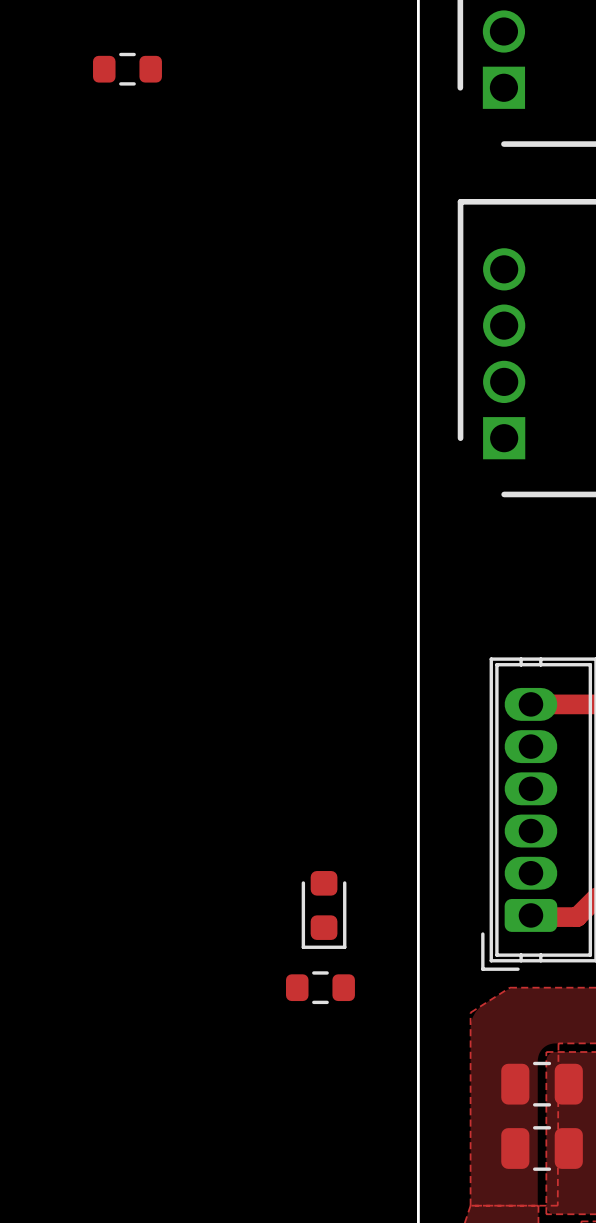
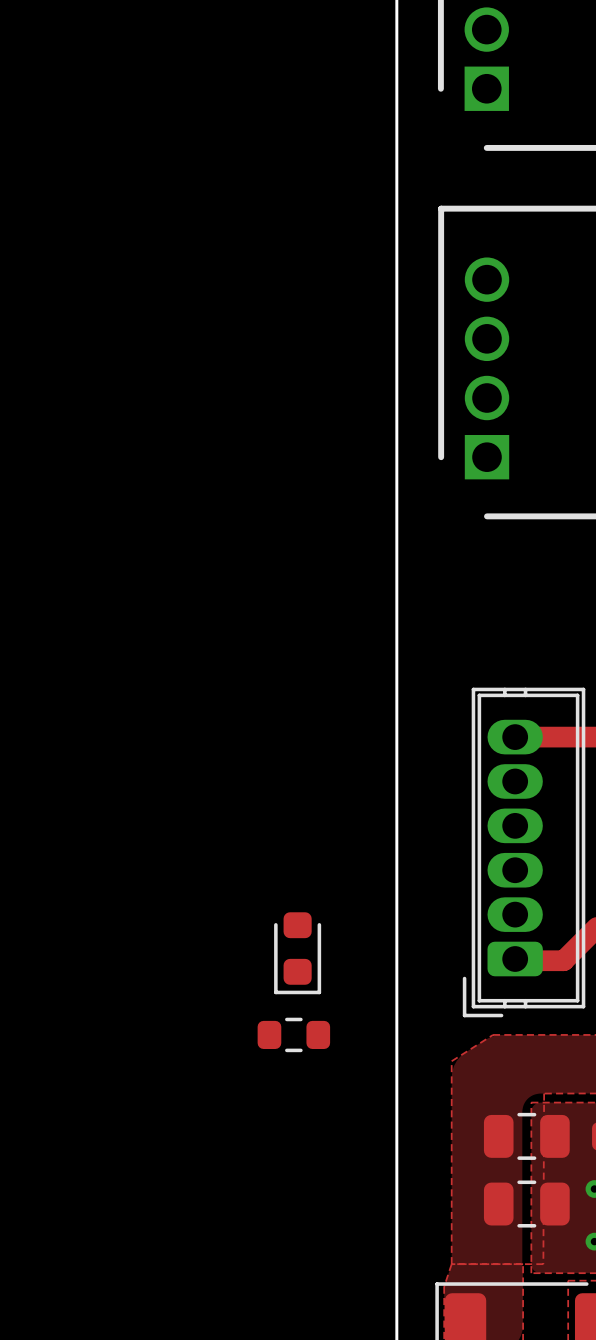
part: (127, 69) -> none

